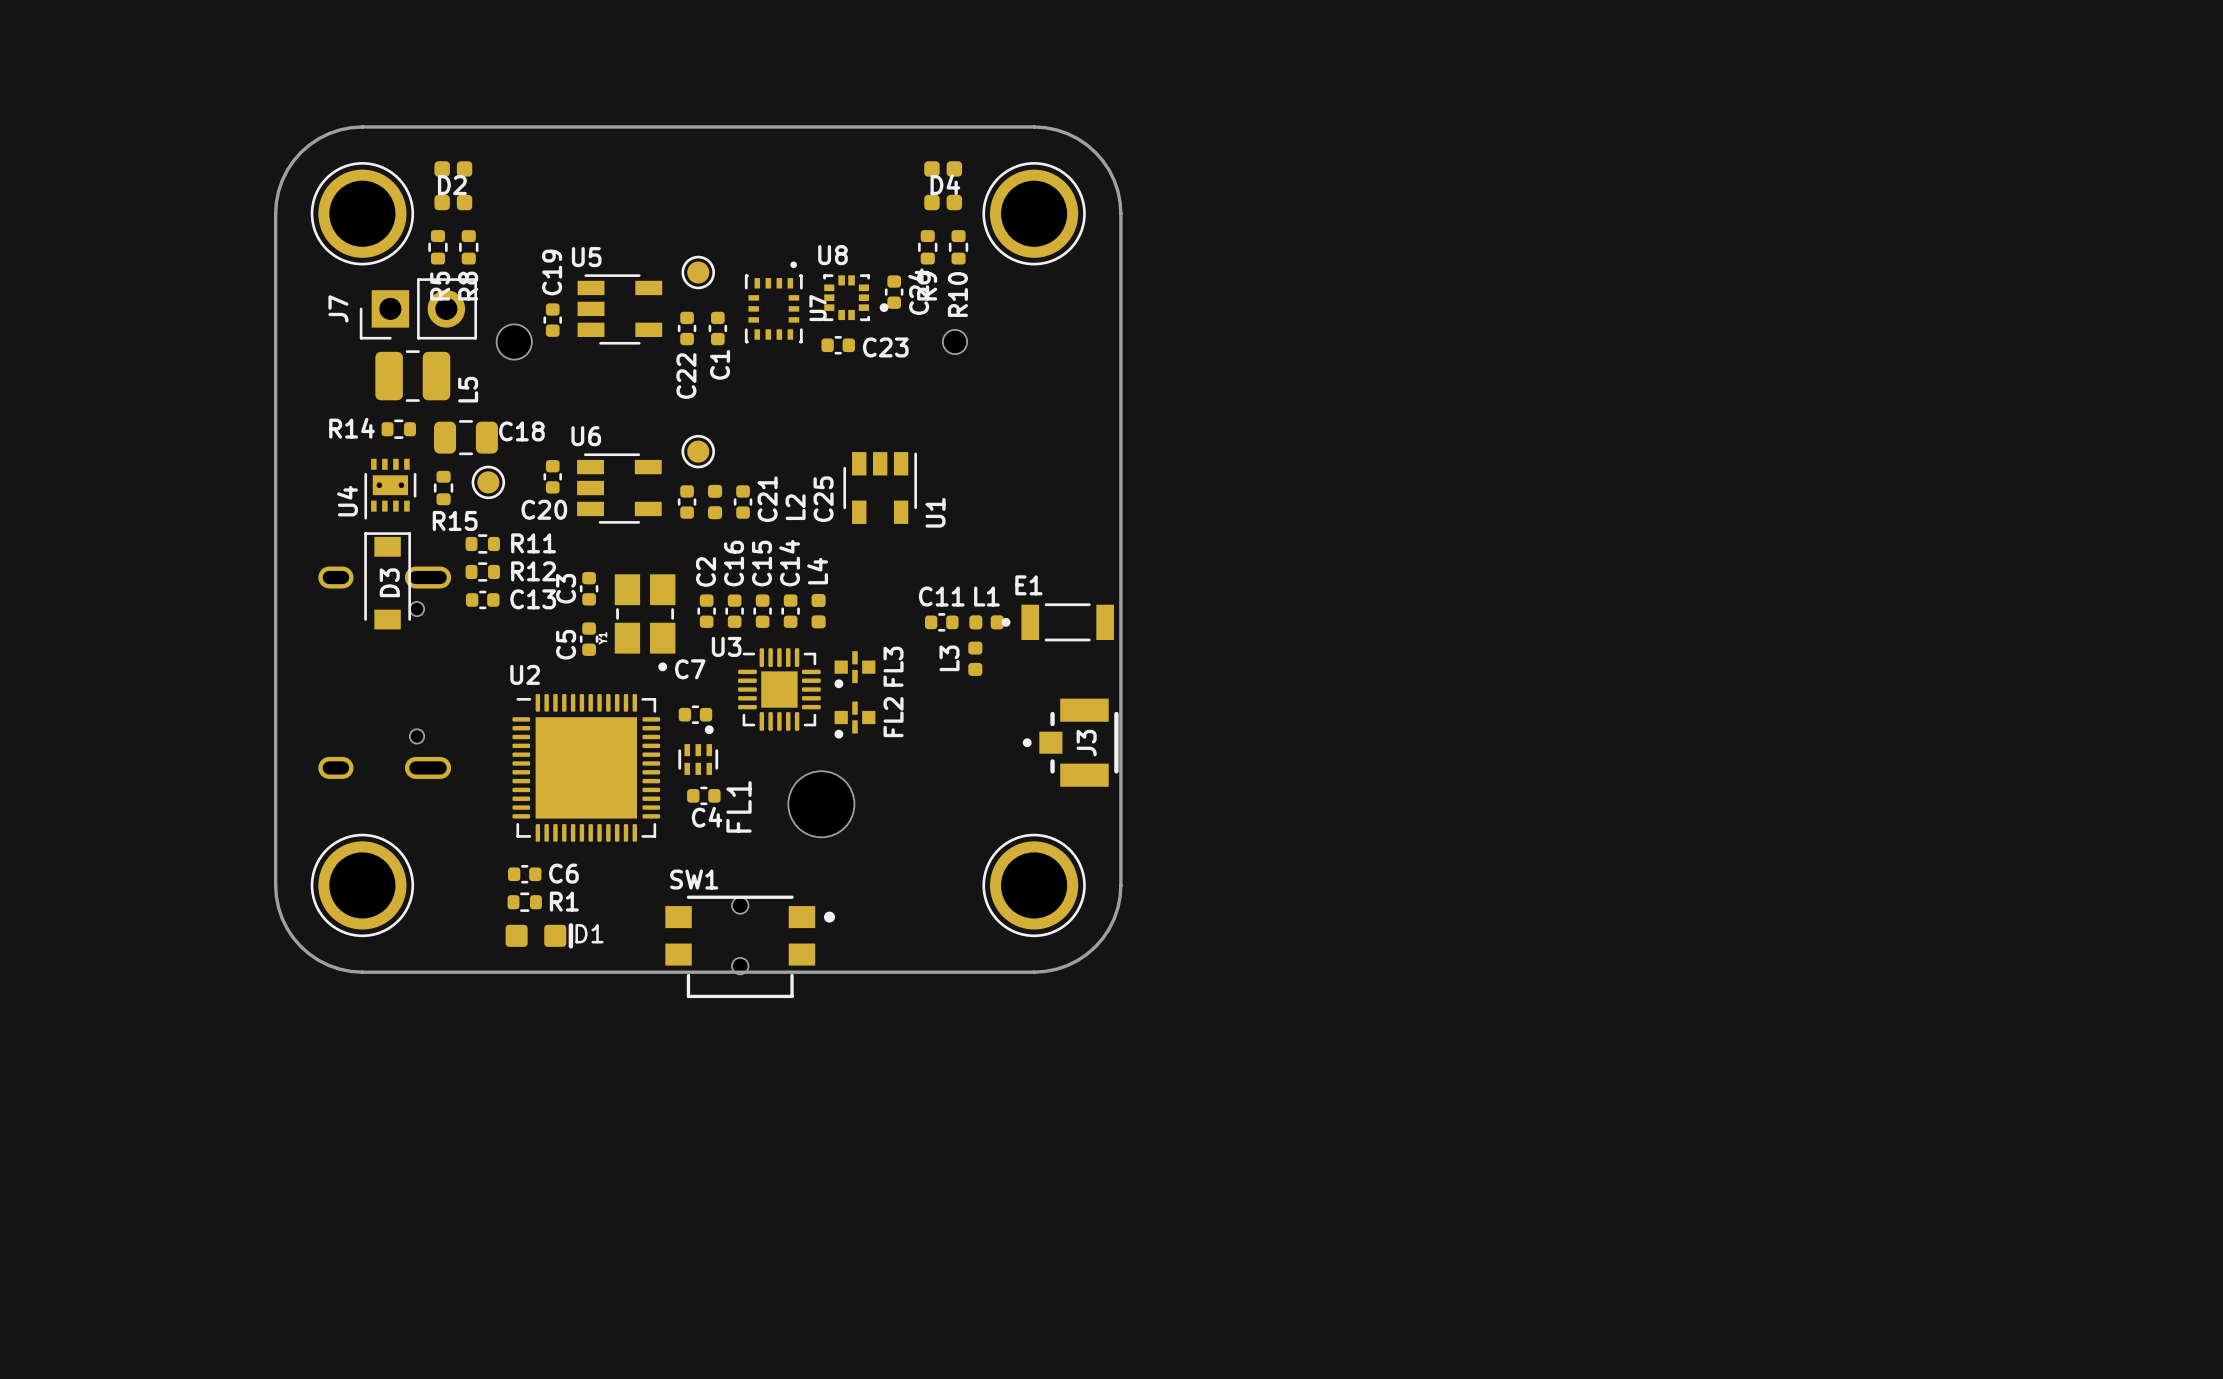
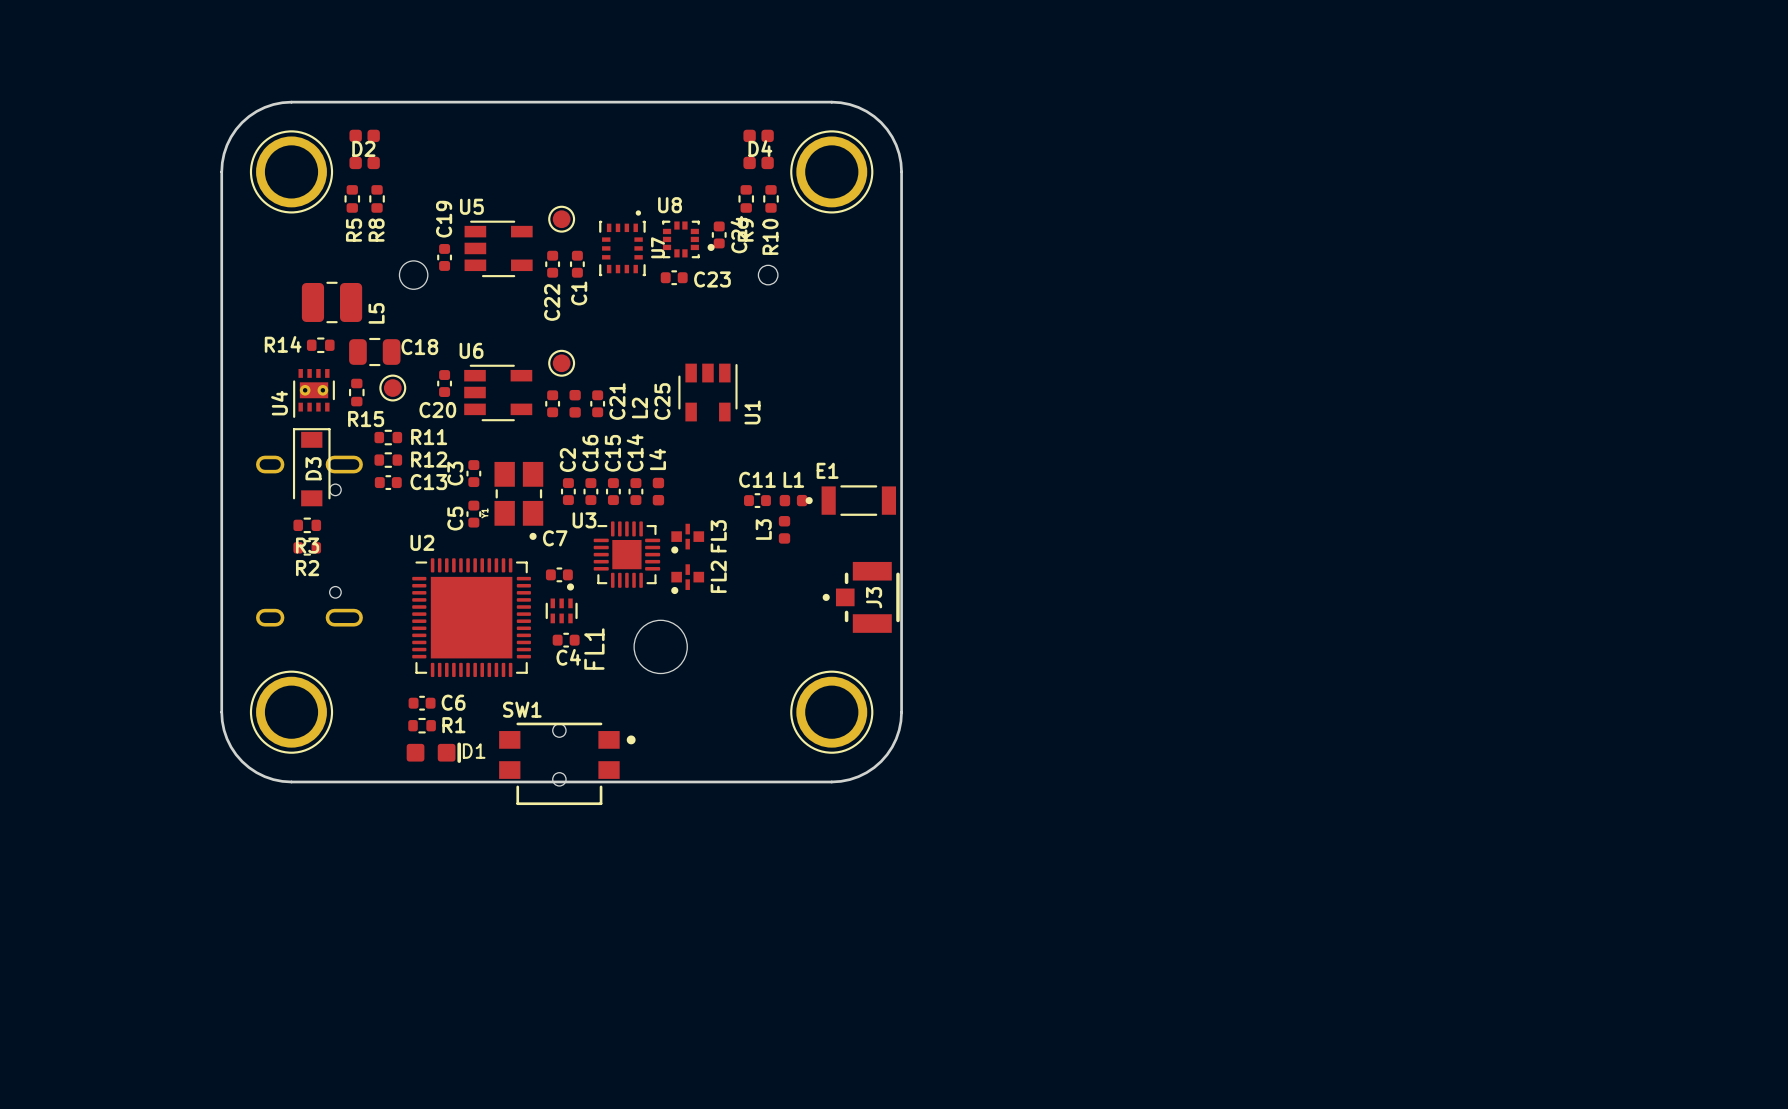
J7: (418, 308) -> none
R3: none -> (307, 525)
R2: none -> (307, 547)
SW1 position: (750, 946) -> (567, 763)

